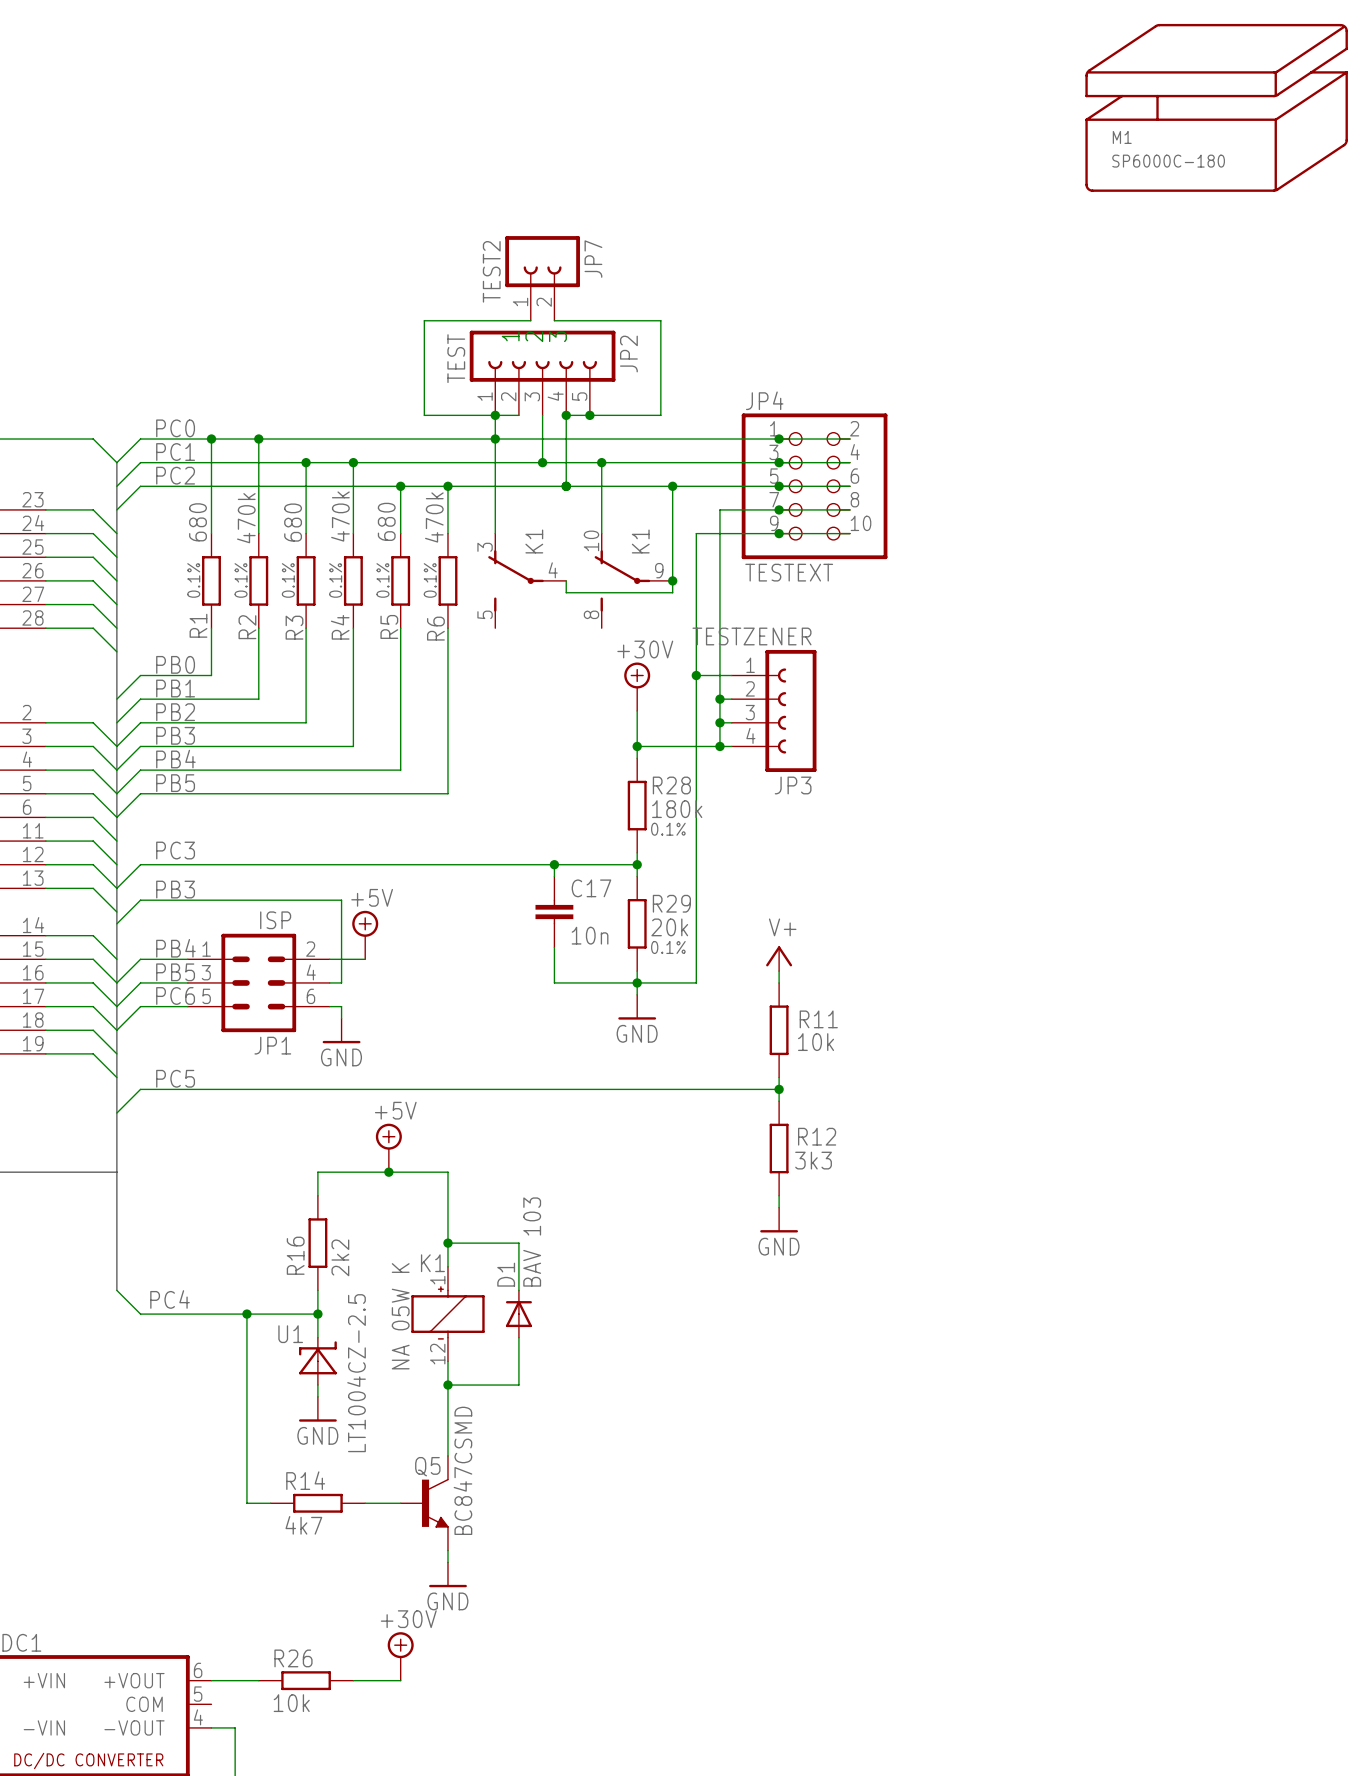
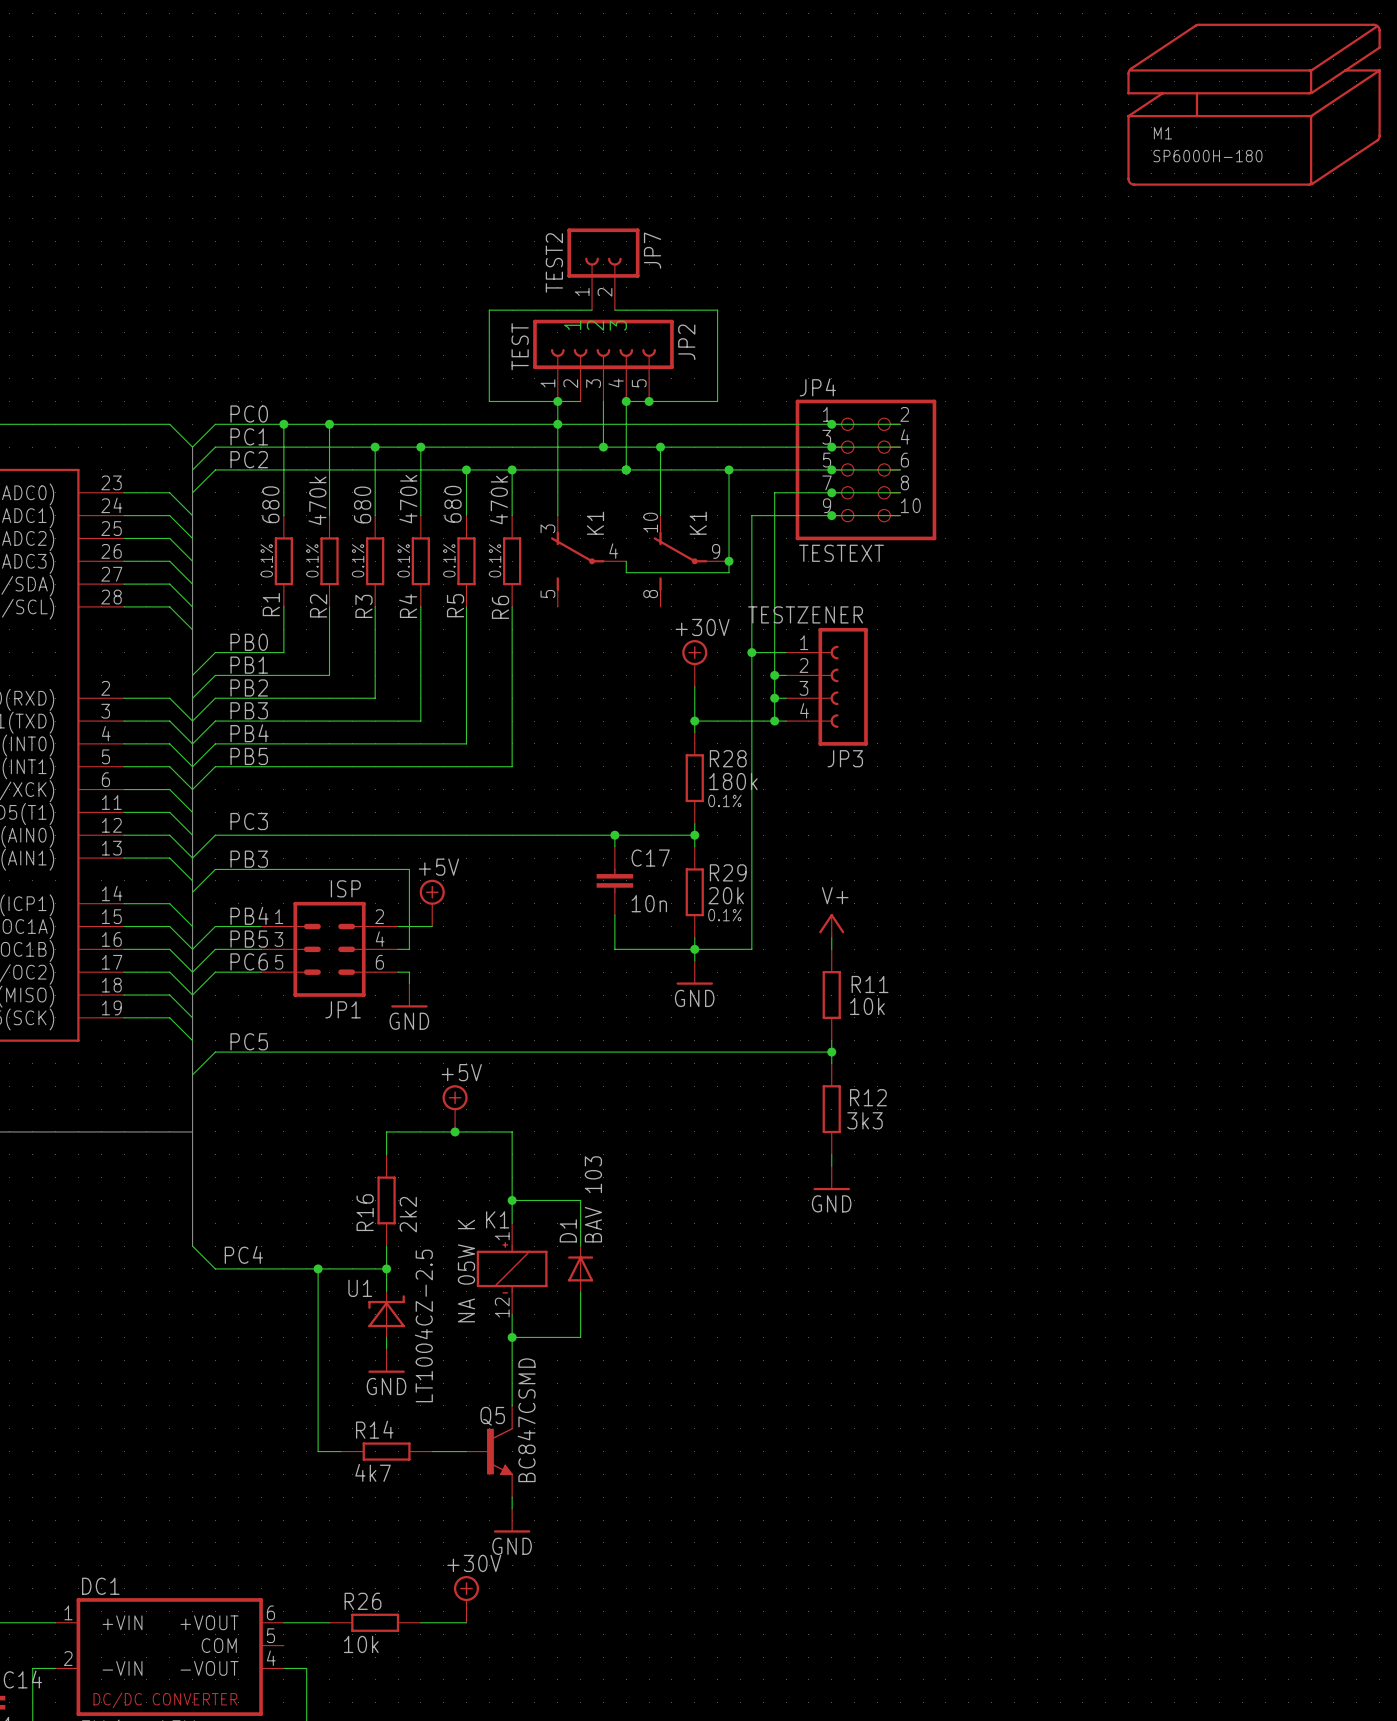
M1 value: SP6000C-180 (1168, 161) -> SP6000H-180 (1207, 156)

